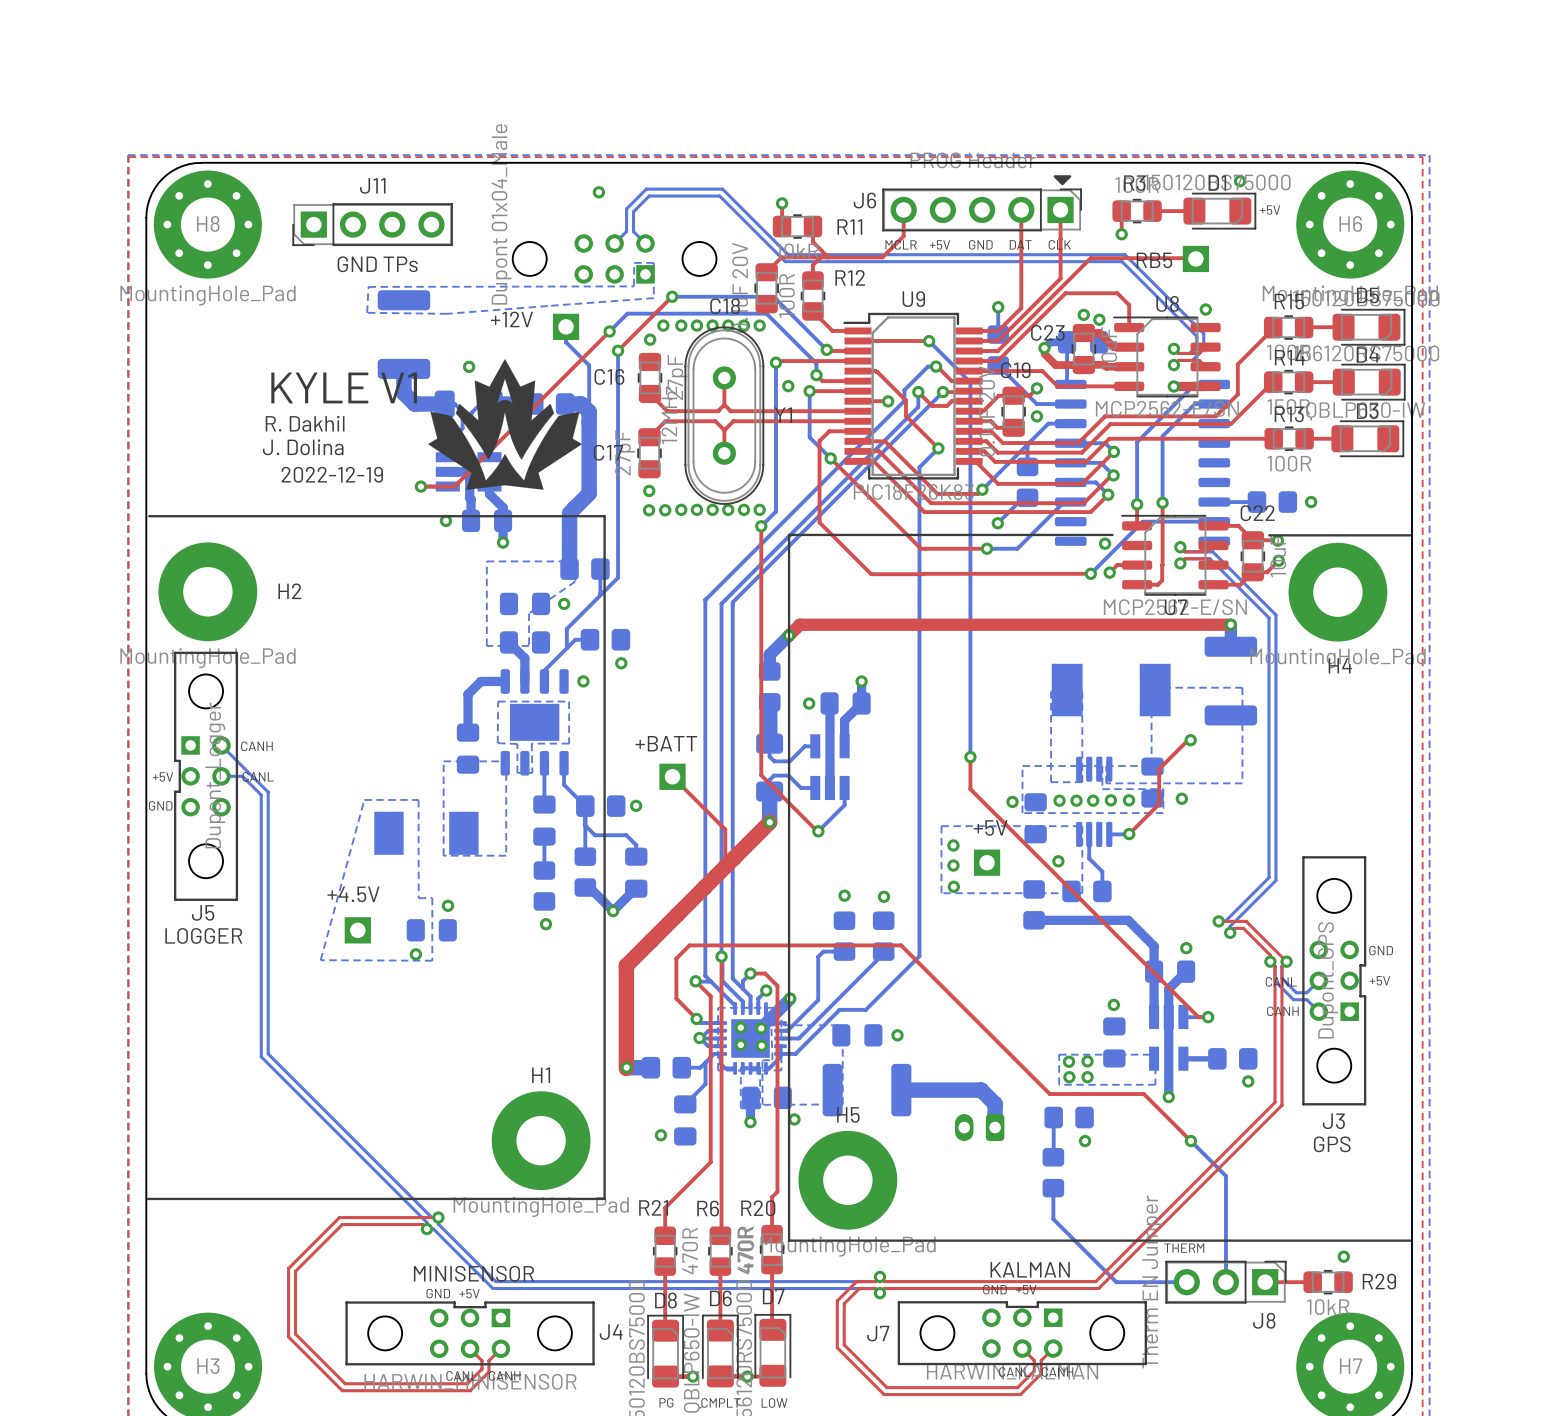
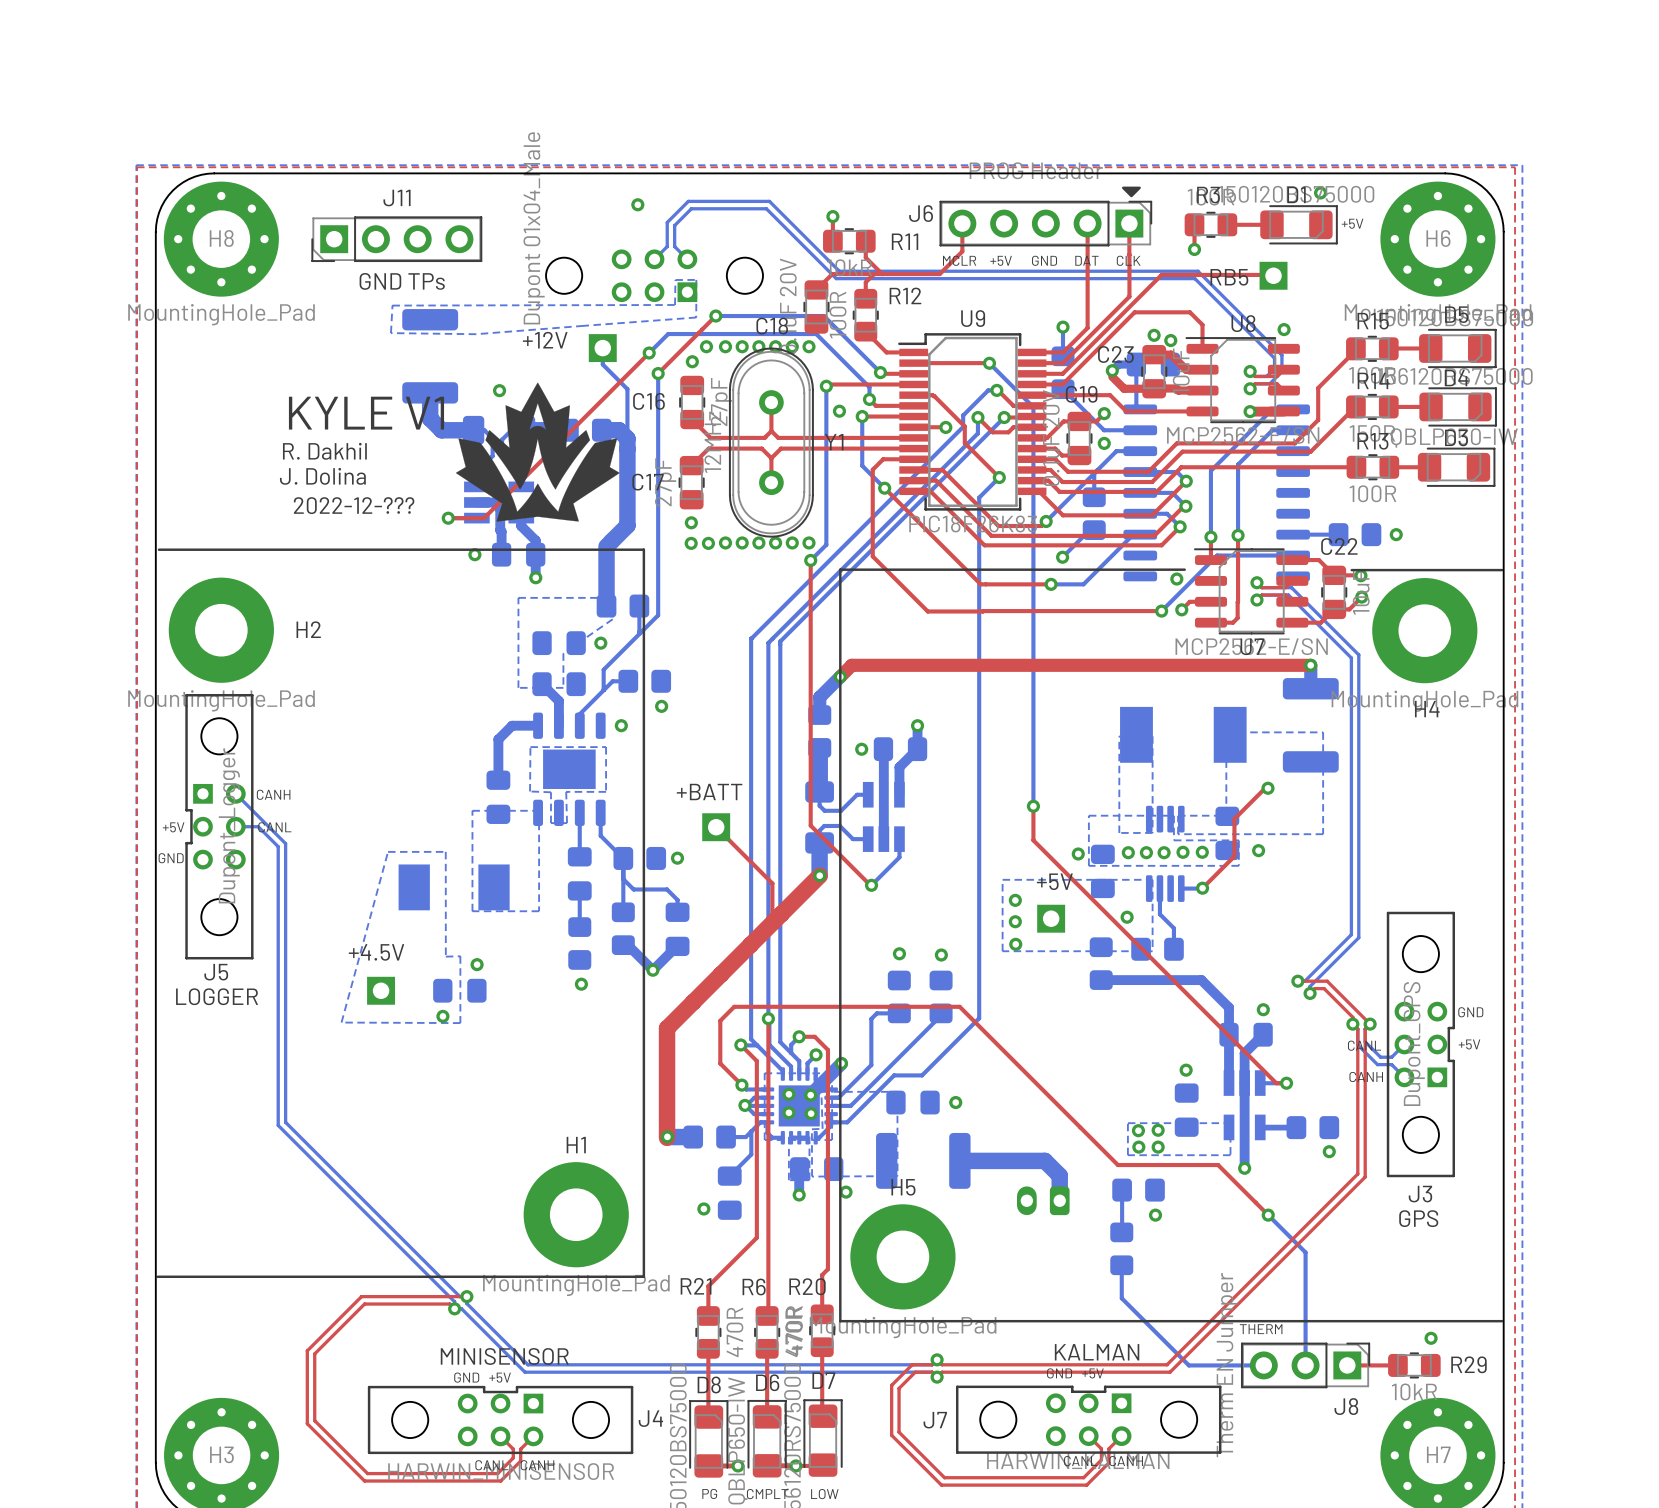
text: 2022-12-19 (332, 474) -> 2022-12-??? (354, 505)

